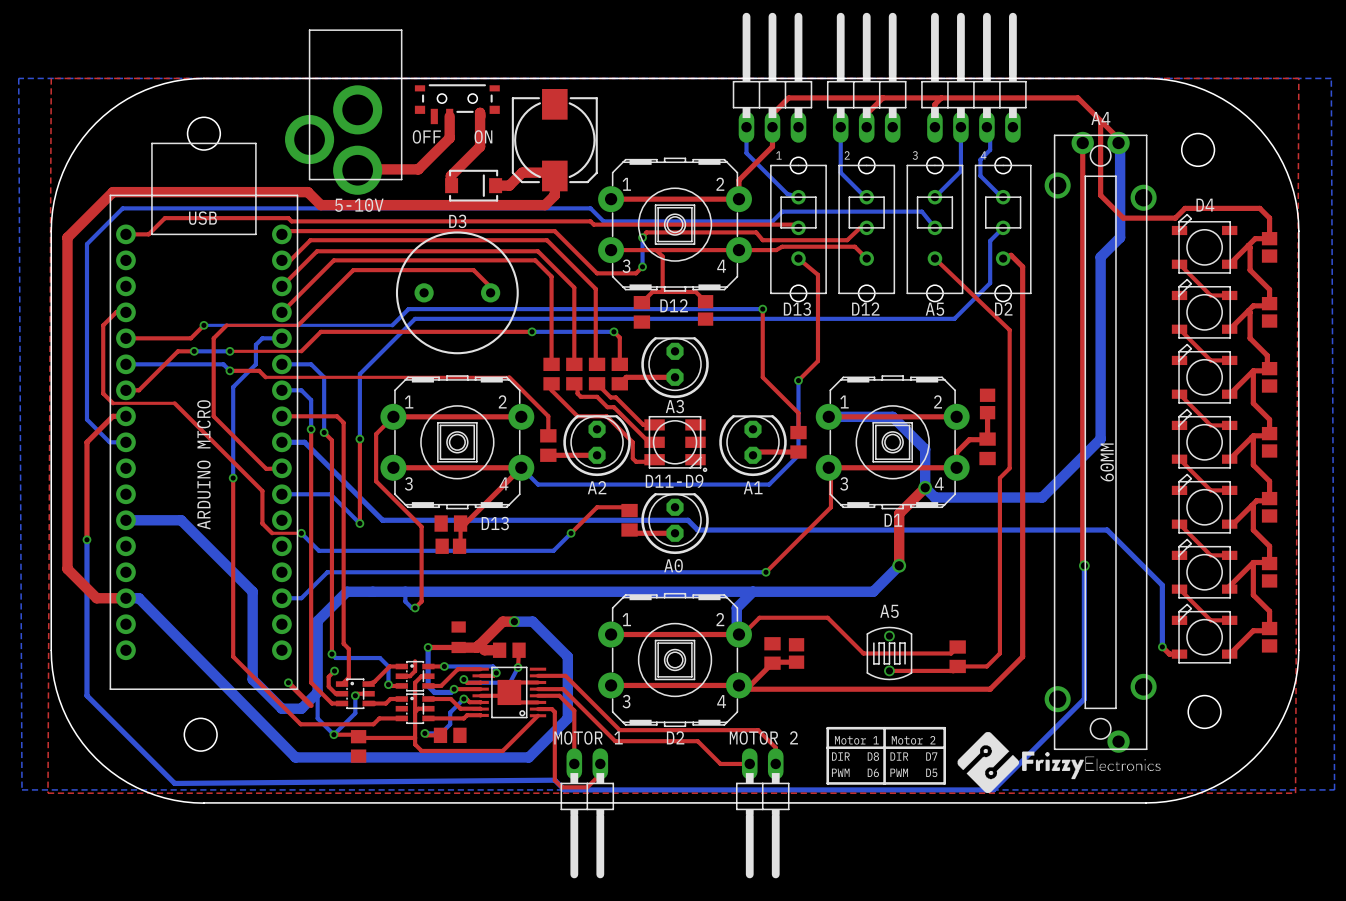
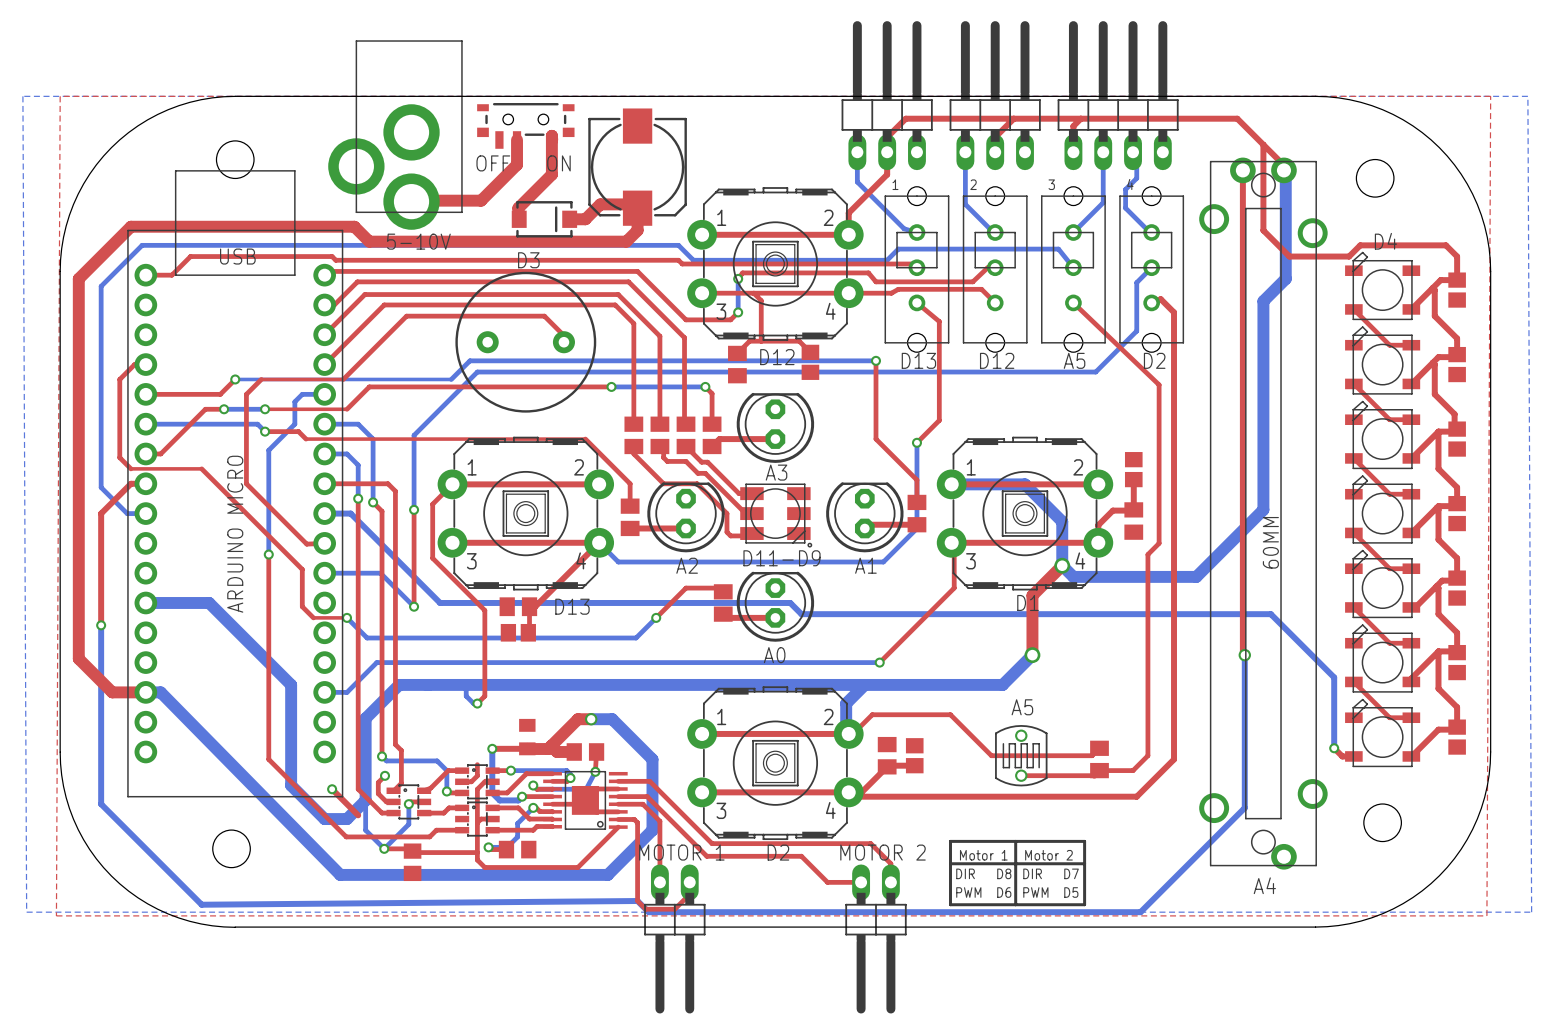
text: A4 (1100, 118) -> none
drawing: [957, 732, 1161, 793] -> none
text: none -> A4 (1264, 885)

